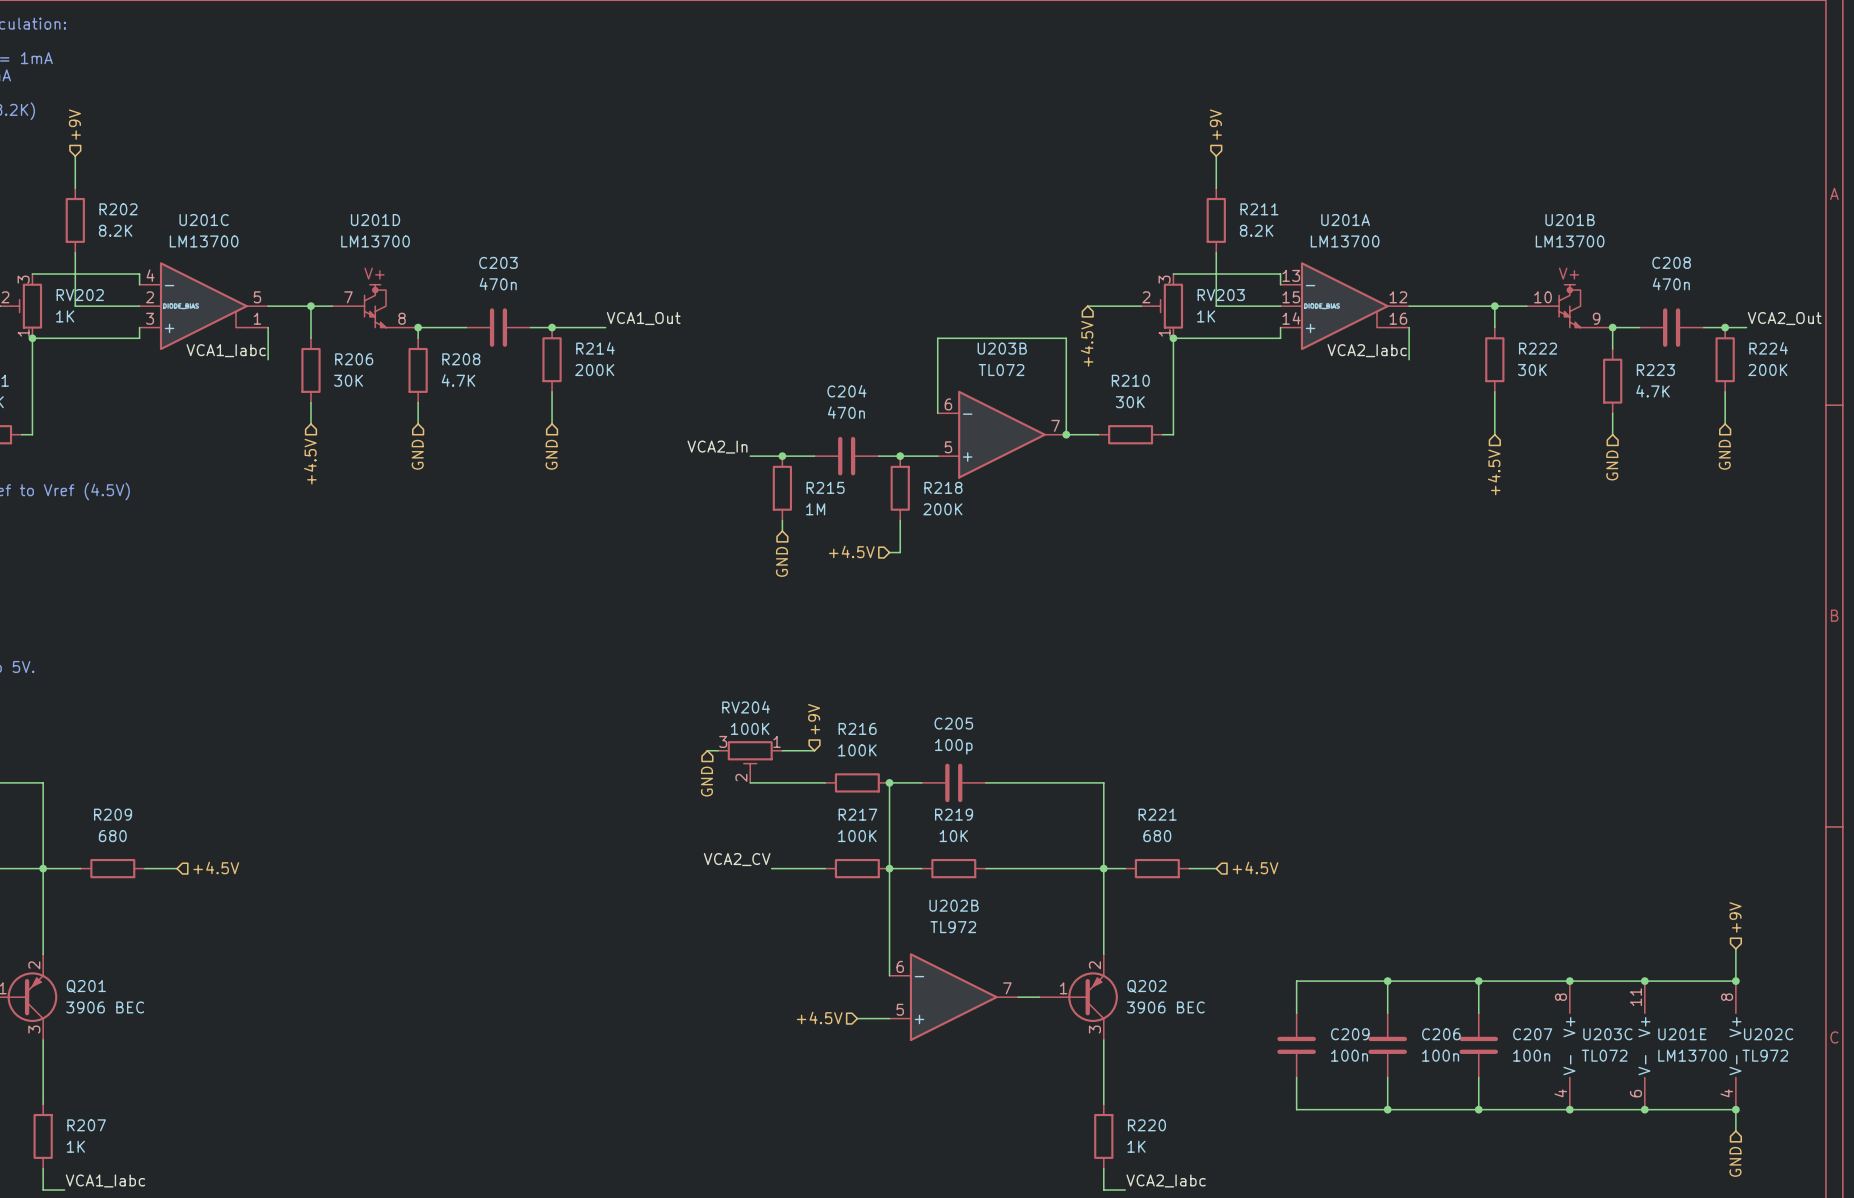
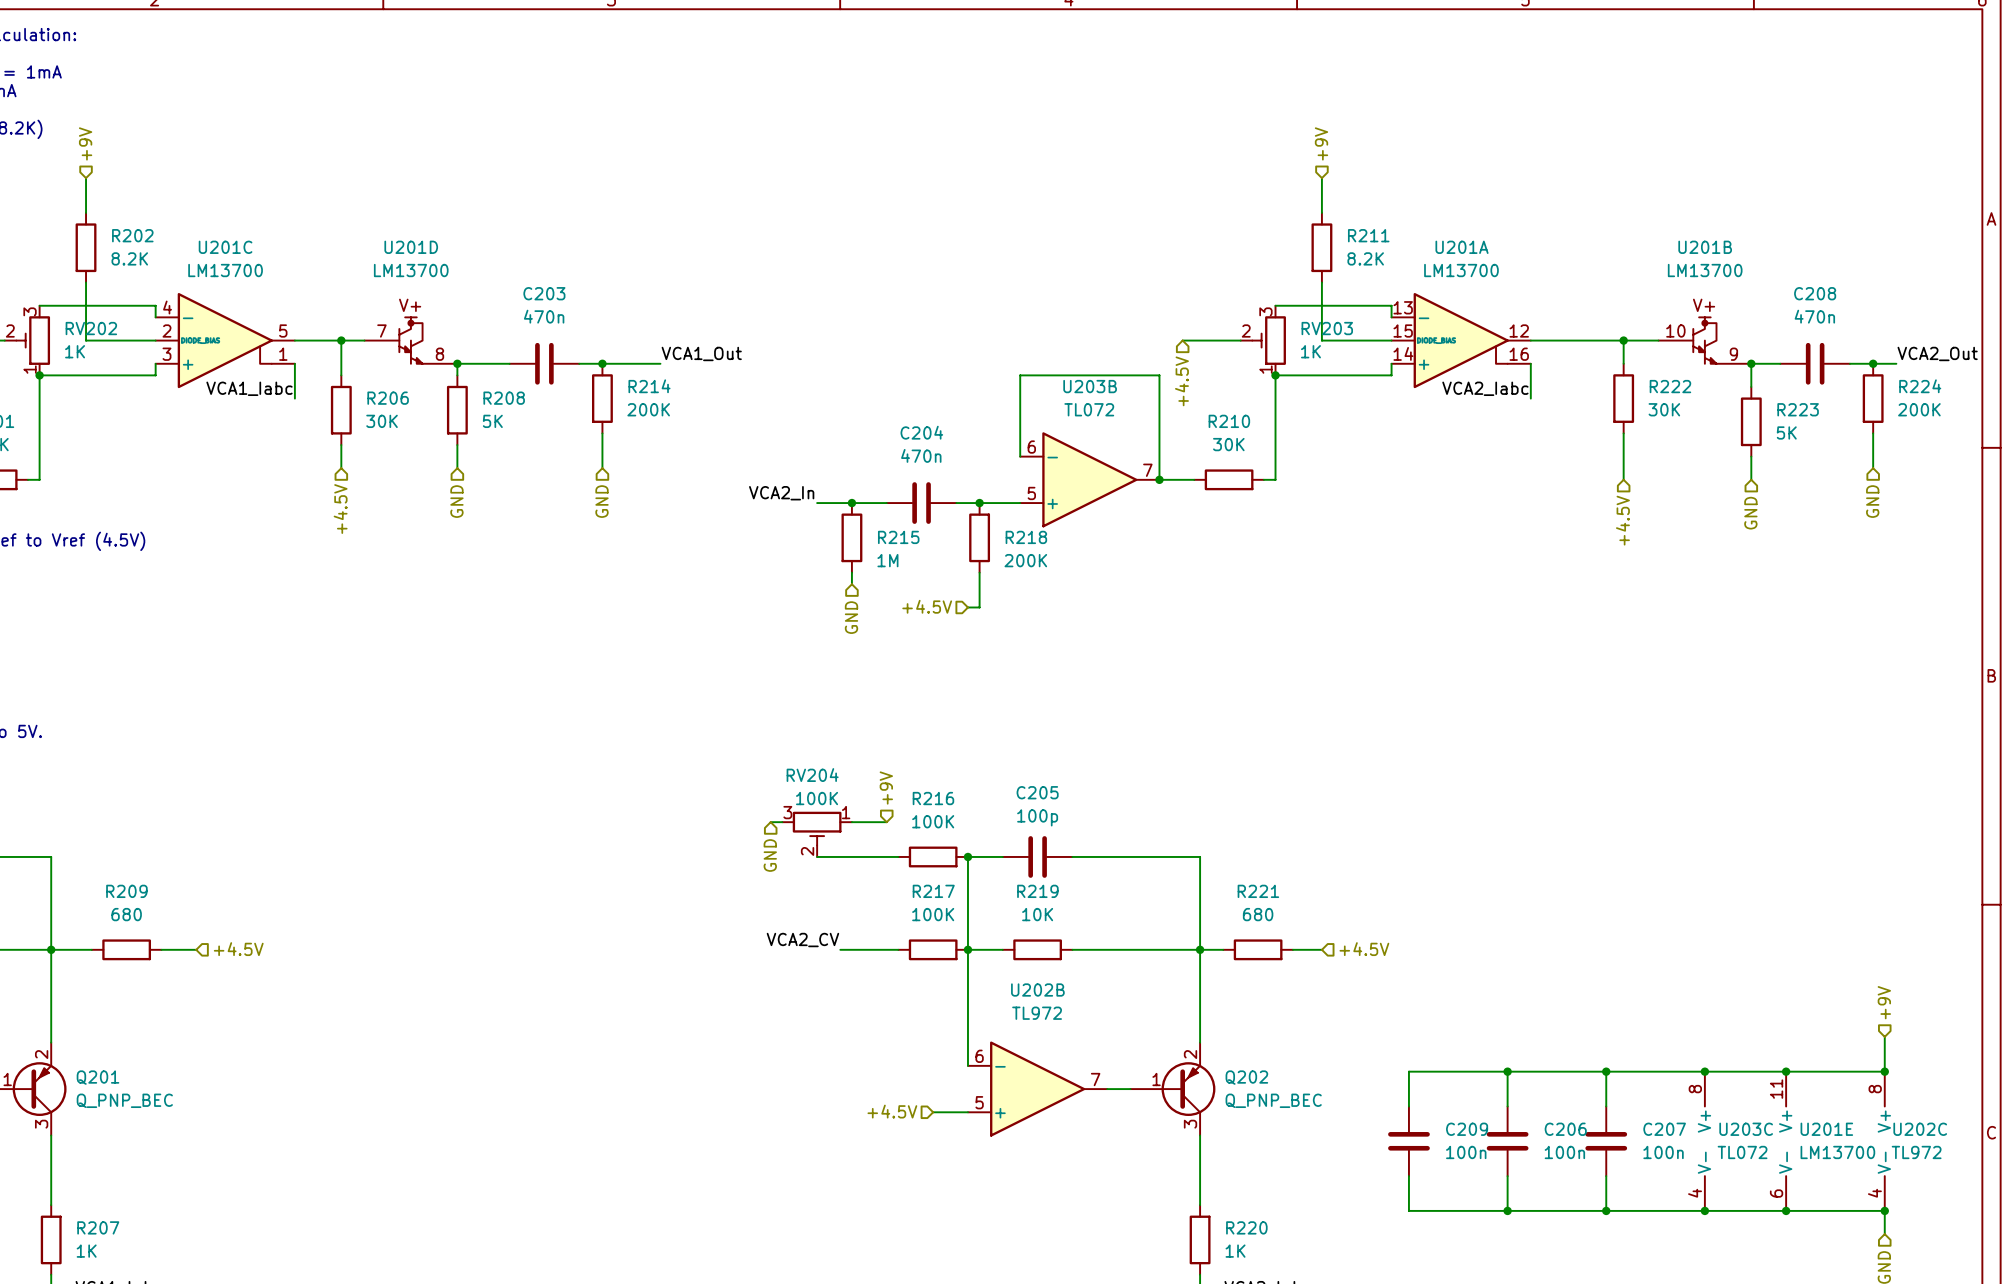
R208 value: 4.7K (458, 380) -> 5K (492, 421)
R223 value: 4.7K (1653, 391) -> 5K (1786, 432)
Q201 value: 3906 BEC (105, 1007) -> Q_PNP_BEC (124, 1100)
Q202 value: 3906 BEC (1165, 1007) -> Q_PNP_BEC (1273, 1100)

